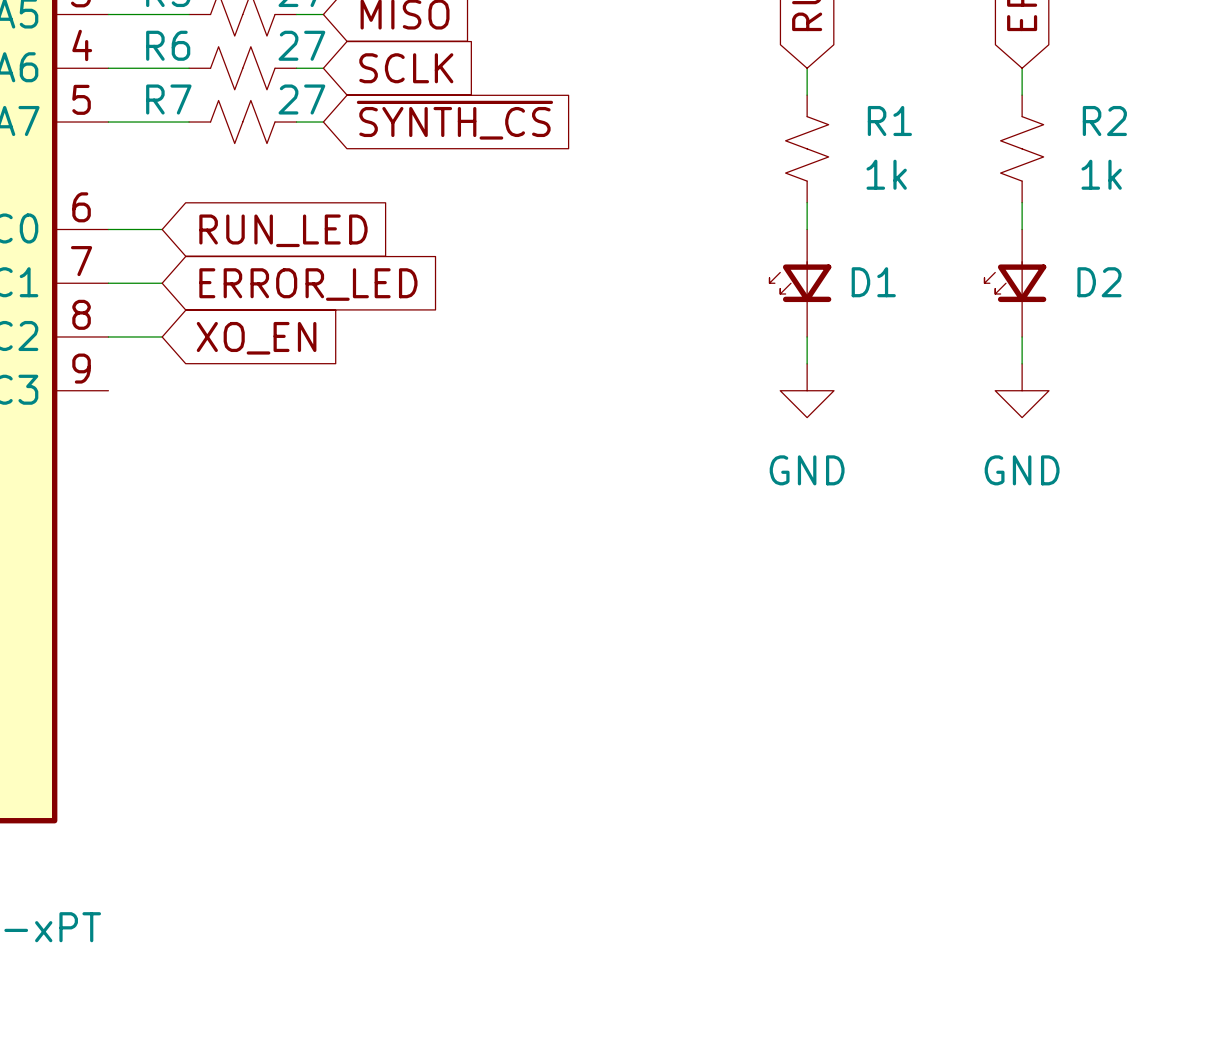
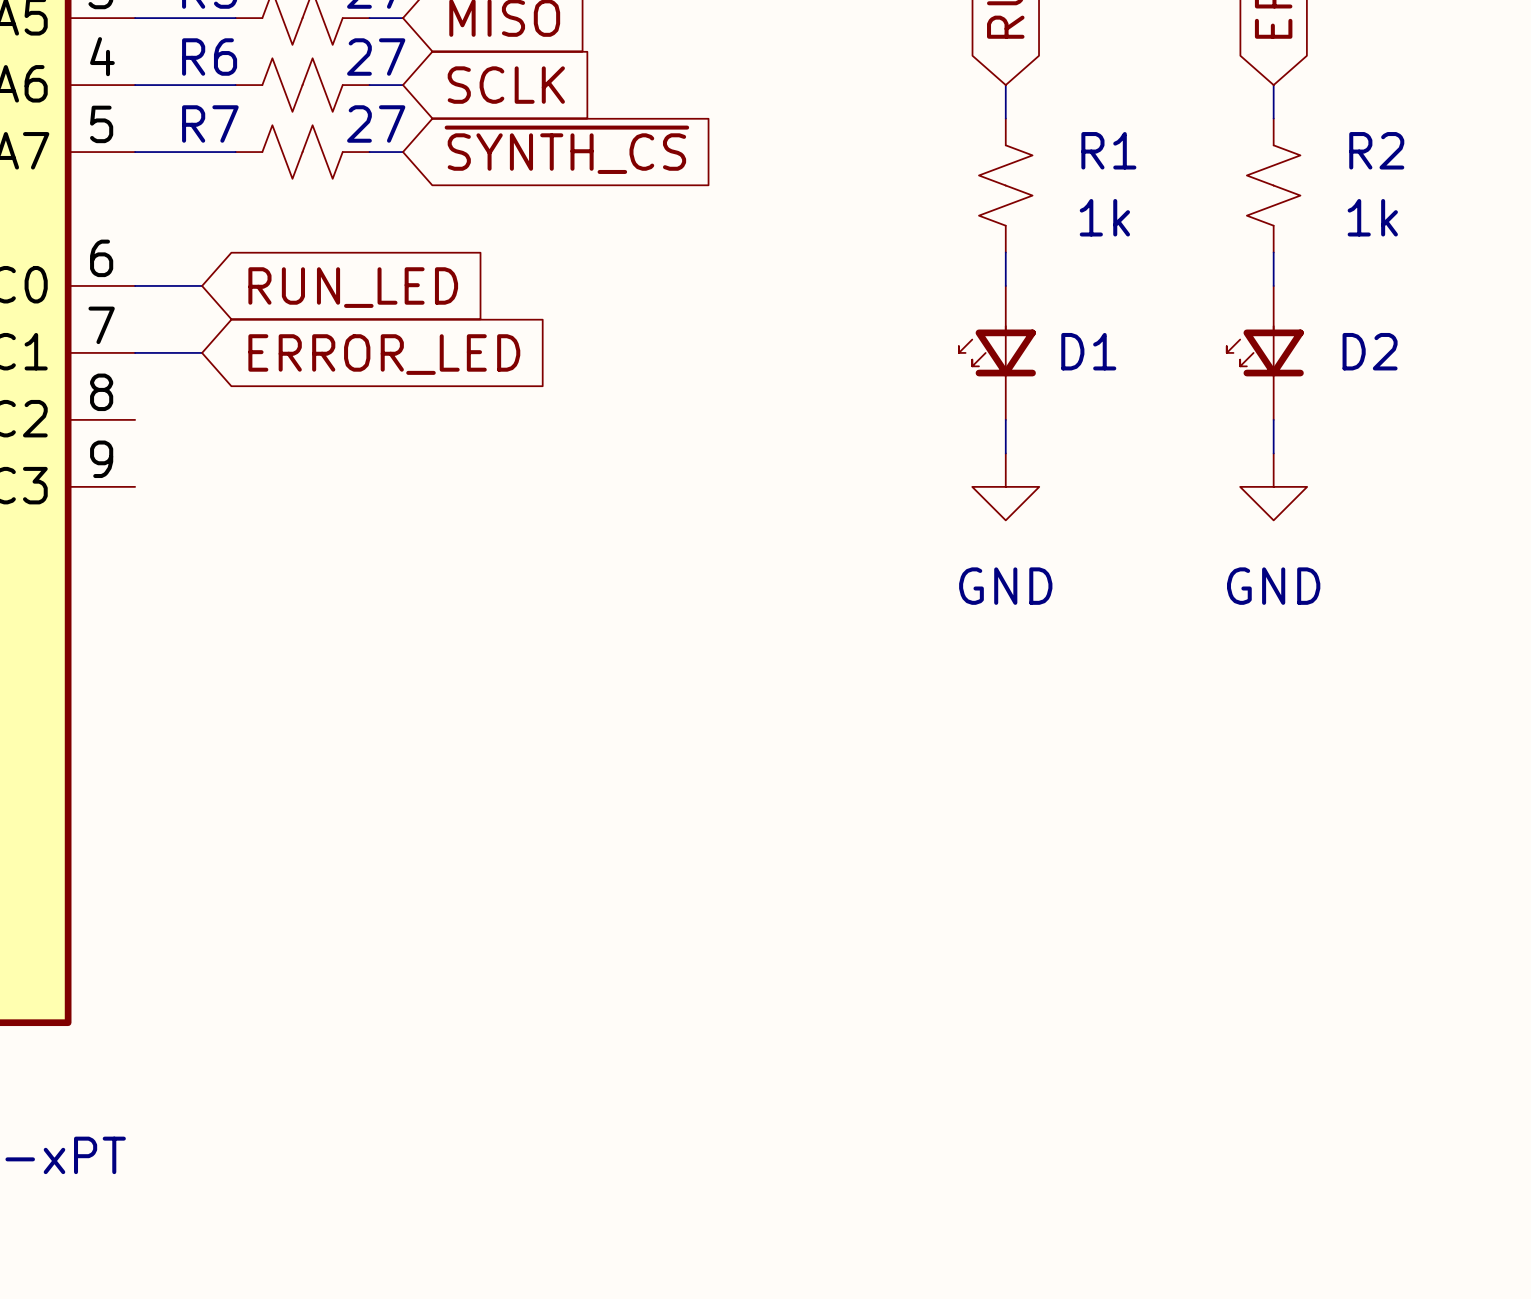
wire: (108, 336) (162, 336) -> none
global label: XO_EN (256, 338) -> none

